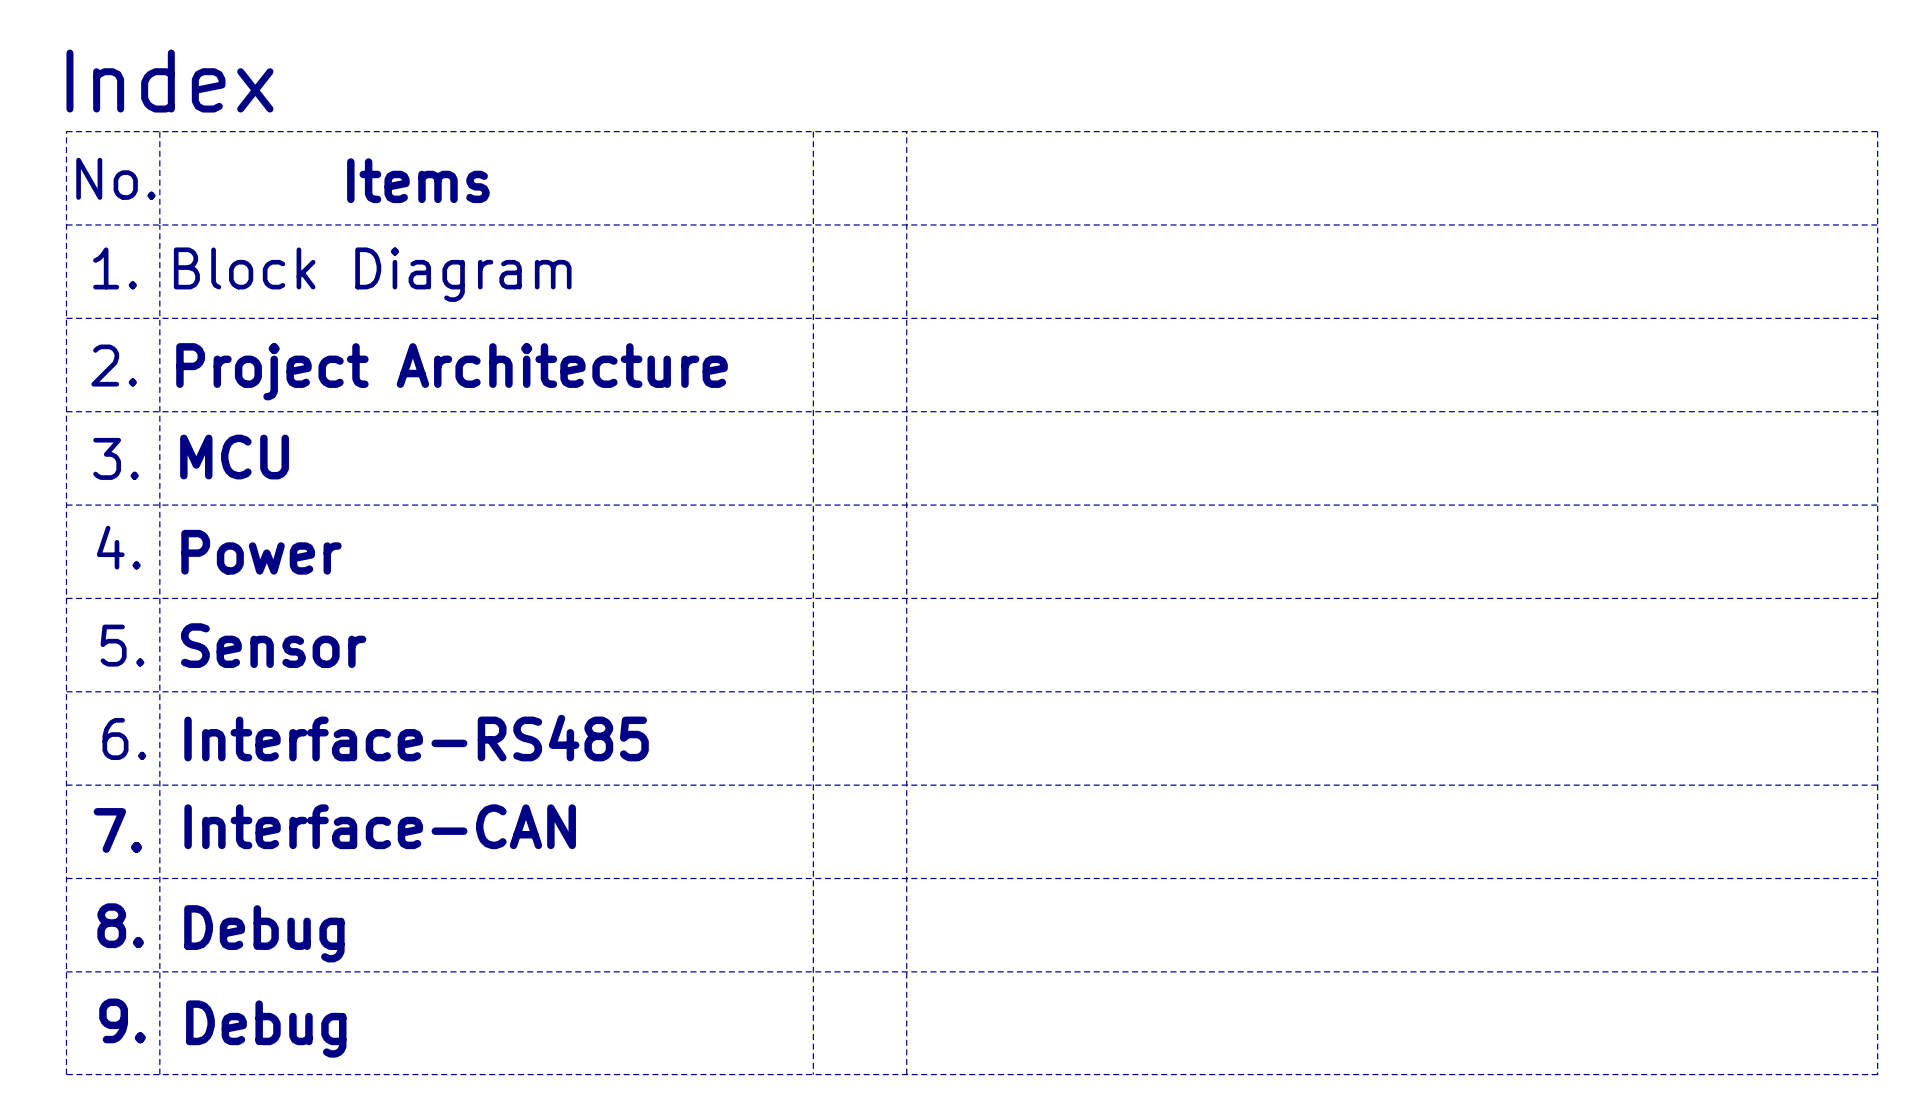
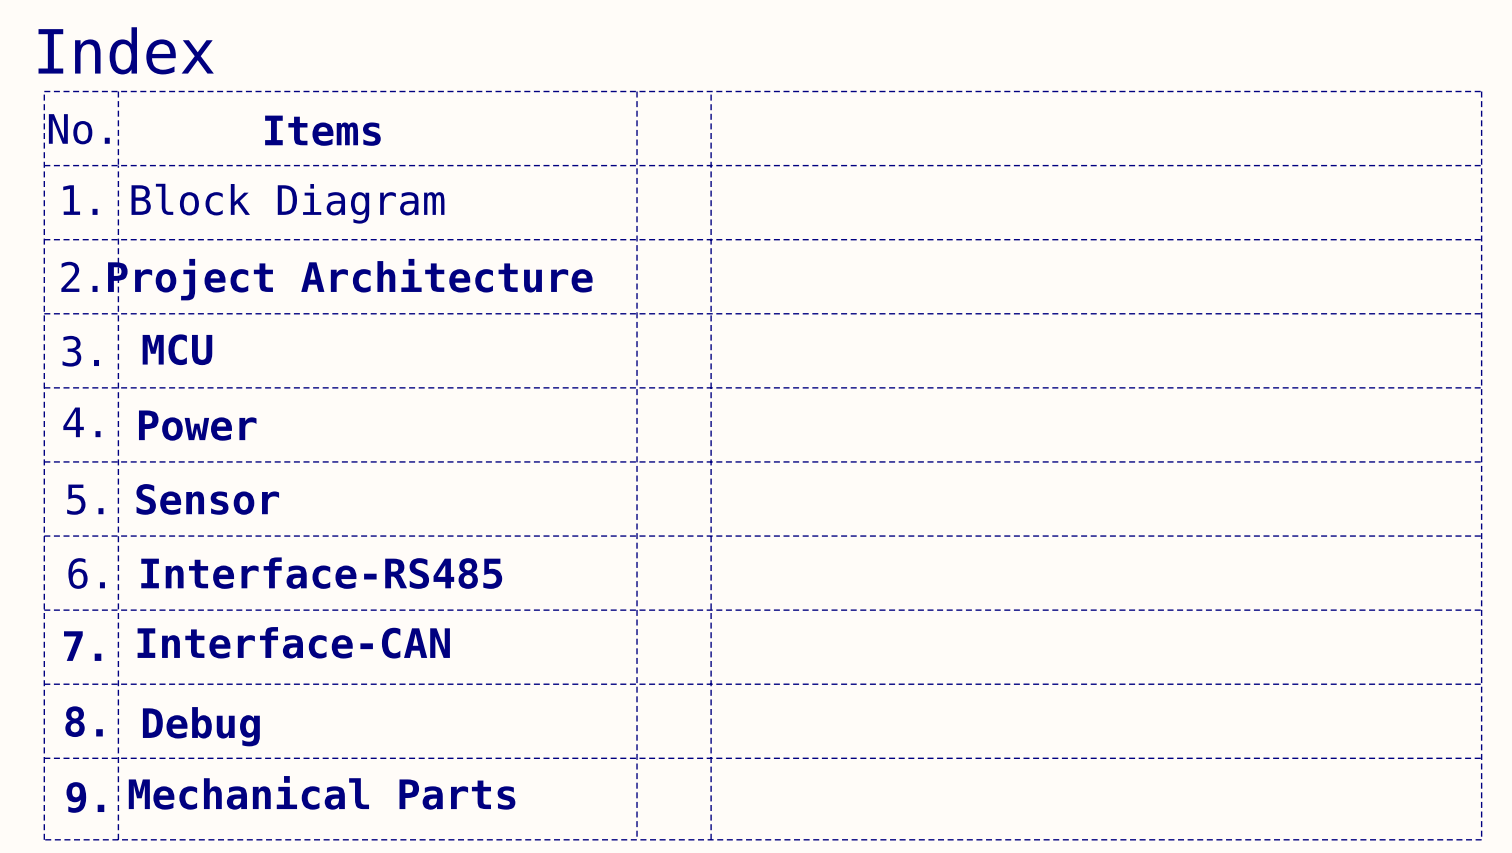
text: none -> Mechanical Parts (322, 792)
text: Debug (266, 1029) -> none

